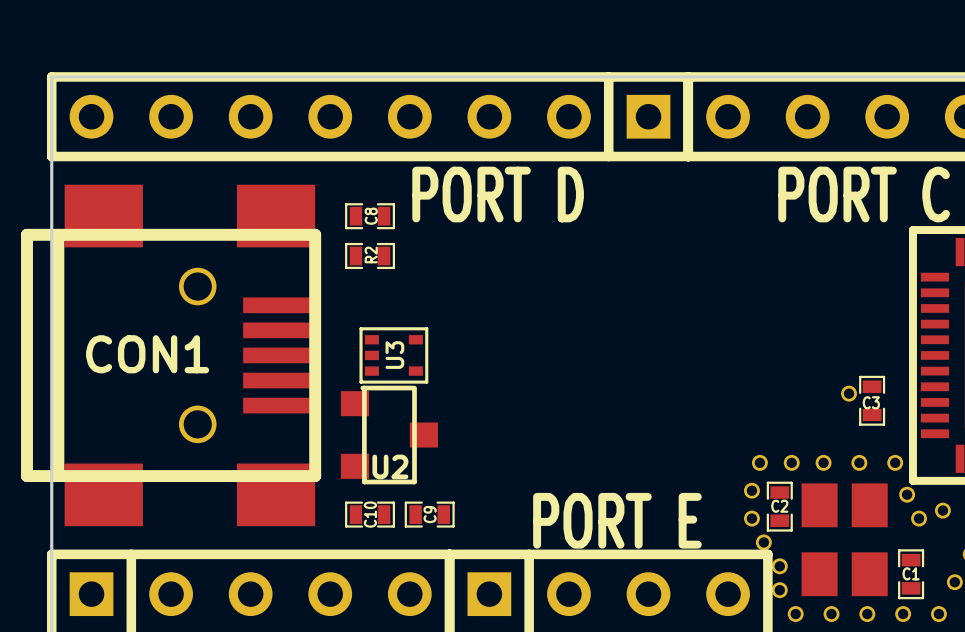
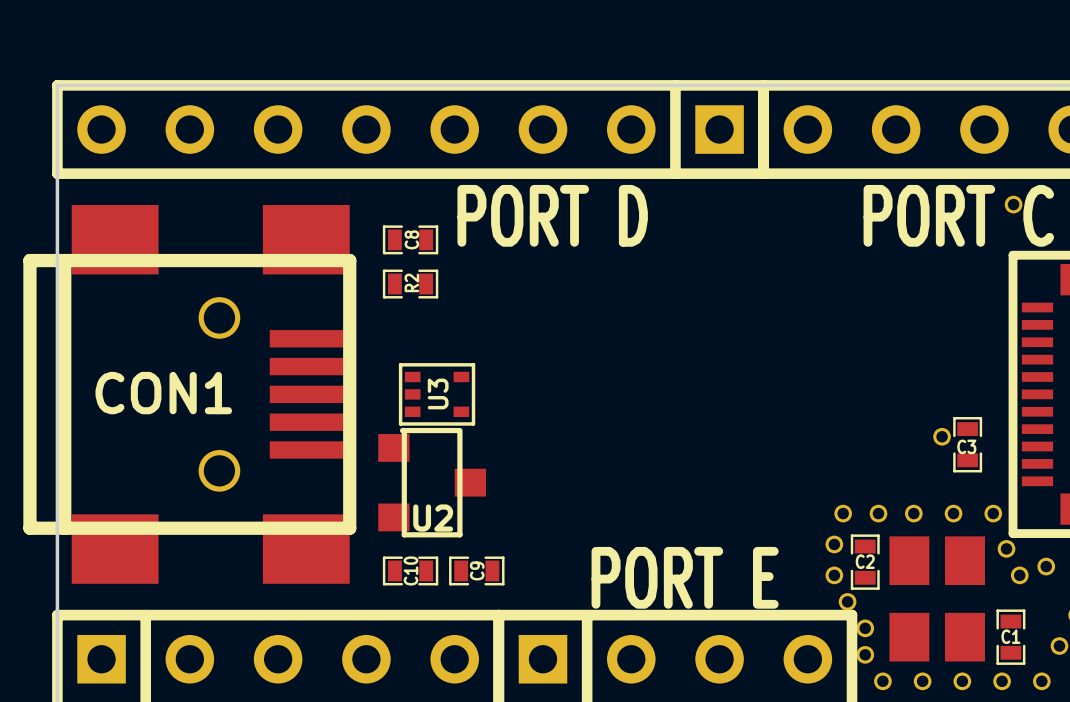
part: none -> (1013, 204)

